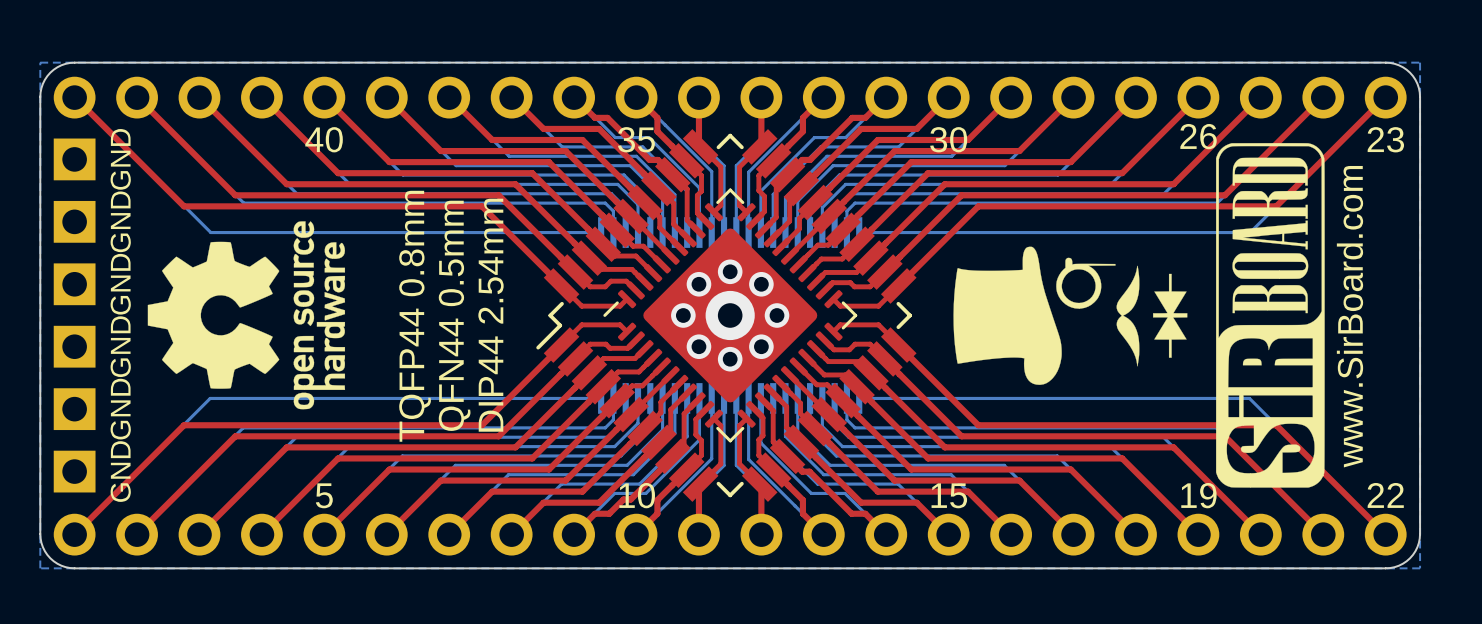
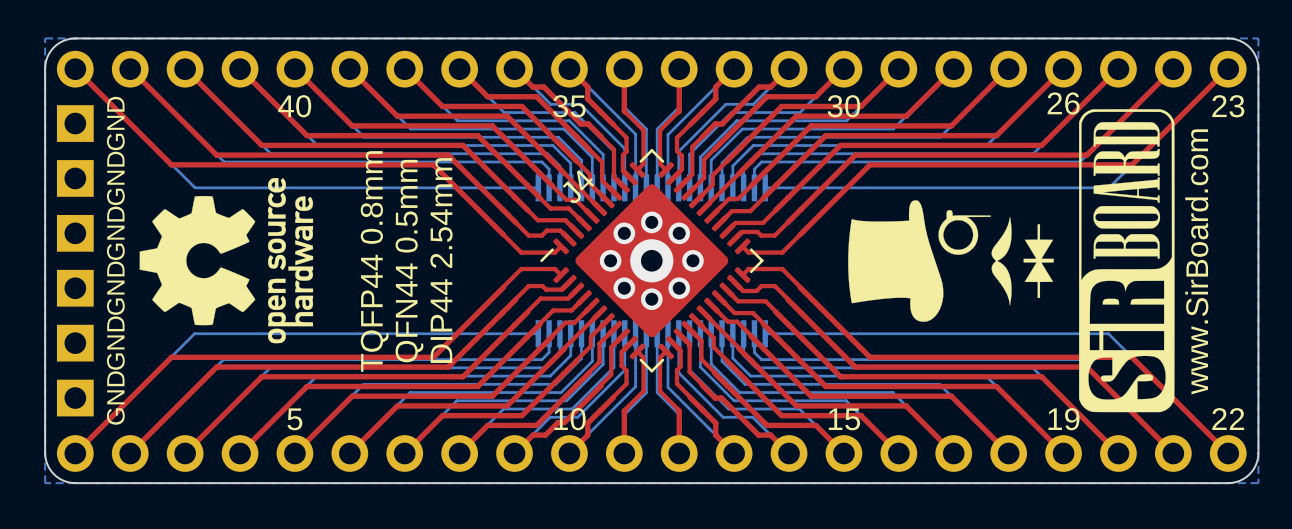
J4 name: none -> J4 (578, 187)
part: (726, 315) -> none

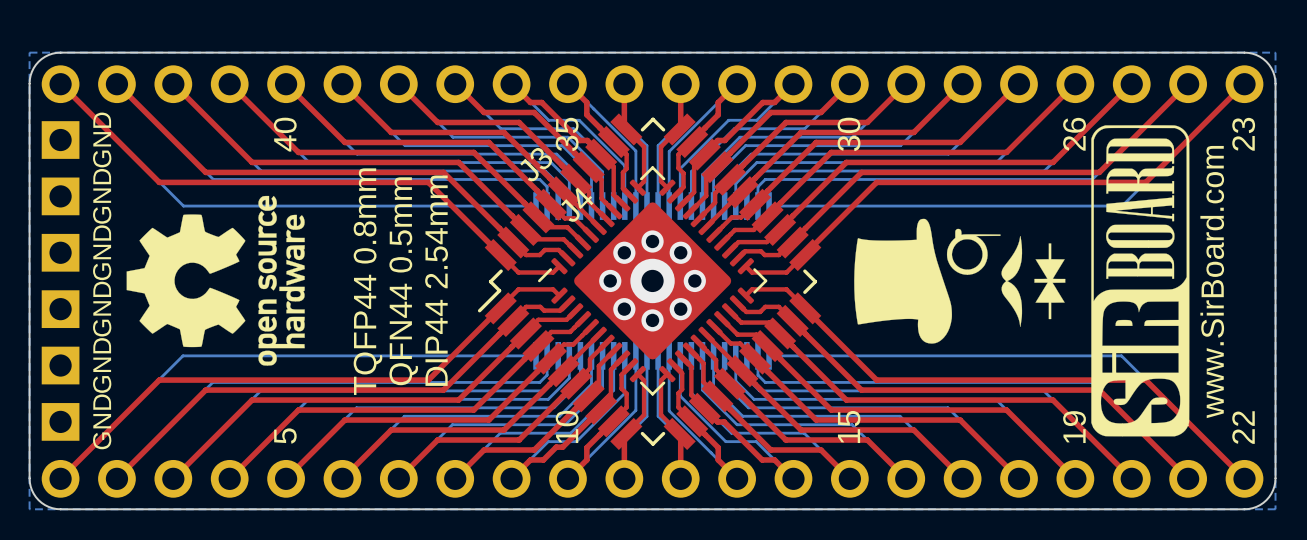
text rotation: 0° (1063, 103) -> 90° counterclockwise (1074, 134)
text rotation: 0° (294, 106) -> 90° counterclockwise (285, 134)
text rotation: 0° (569, 106) -> 90° counterclockwise (567, 134)
text rotation: 0° (843, 106) -> 90° counterclockwise (849, 134)
text rotation: 0° (1228, 106) -> 90° counterclockwise (1243, 134)
J3: none -> (649, 281)
text rotation: 0° (294, 419) -> 90° counterclockwise (285, 436)
text rotation: 0° (570, 419) -> 90° counterclockwise (567, 426)
text rotation: 0° (844, 419) -> 90° counterclockwise (849, 426)
text rotation: 0° (1063, 419) -> 90° counterclockwise (1074, 427)
text rotation: 0° (1228, 419) -> 90° counterclockwise (1243, 427)

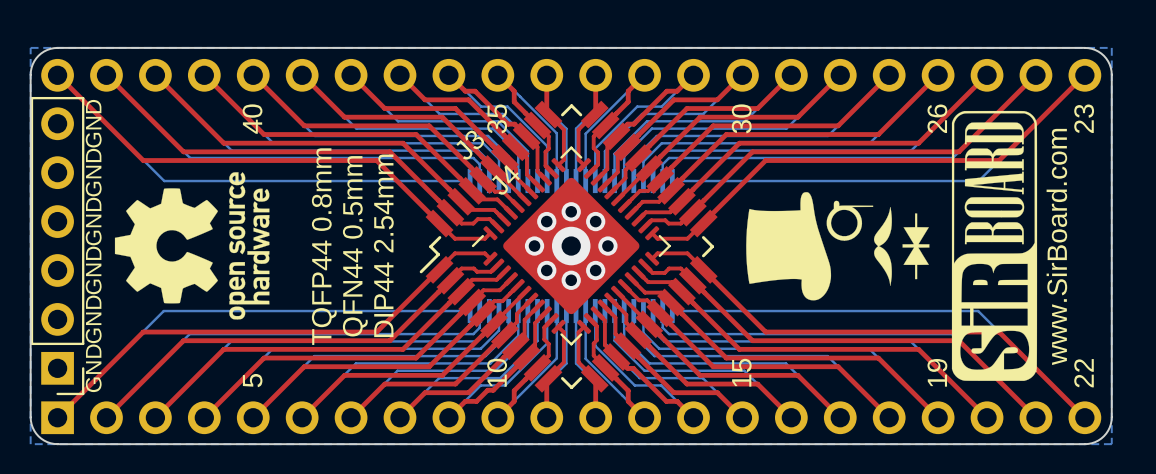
part footprint: [41, 121, 80, 441] -> [30, 96, 85, 396]
part footprint: [41, 459, 1264, 498] -> [41, 401, 1102, 435]

